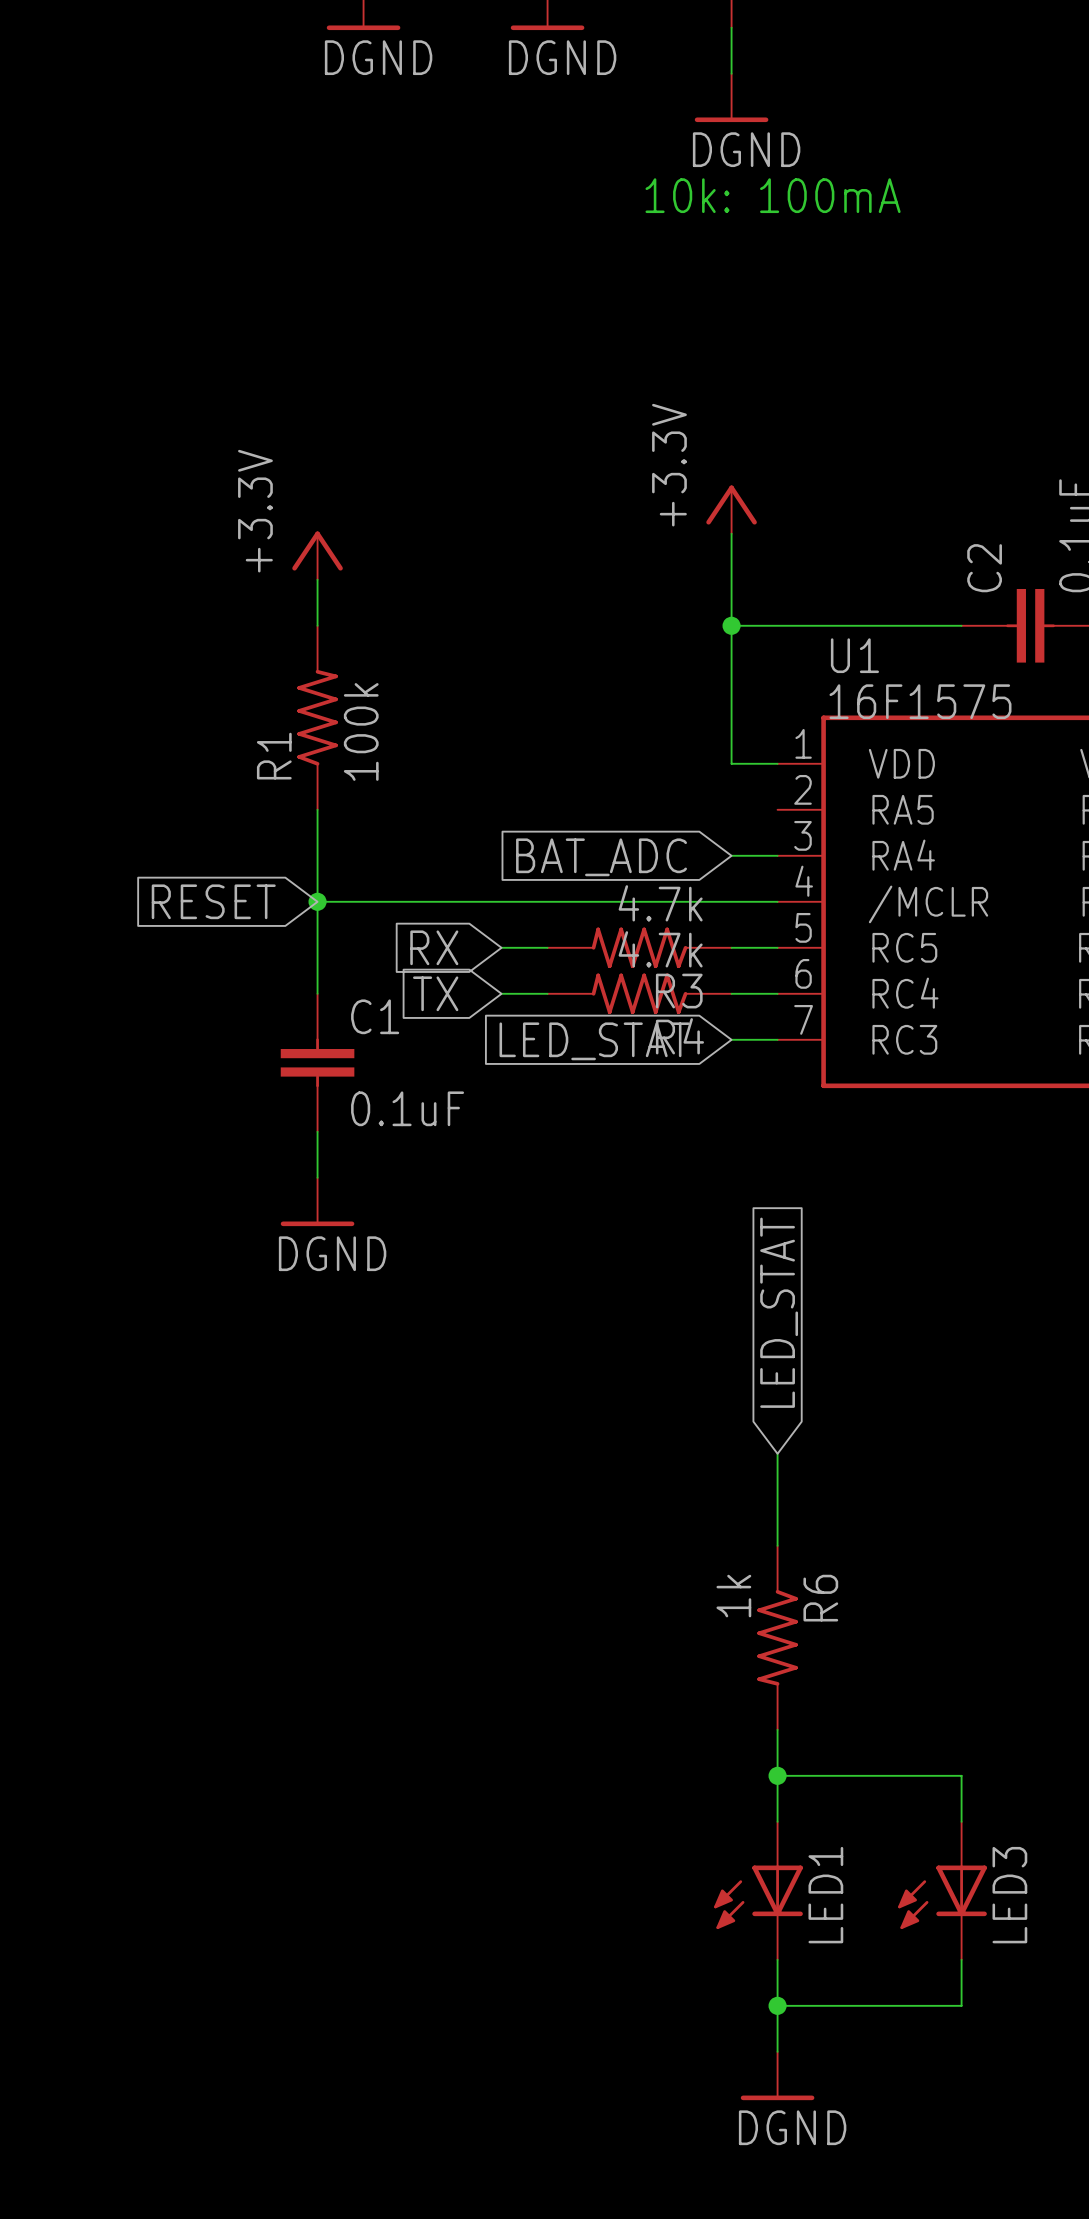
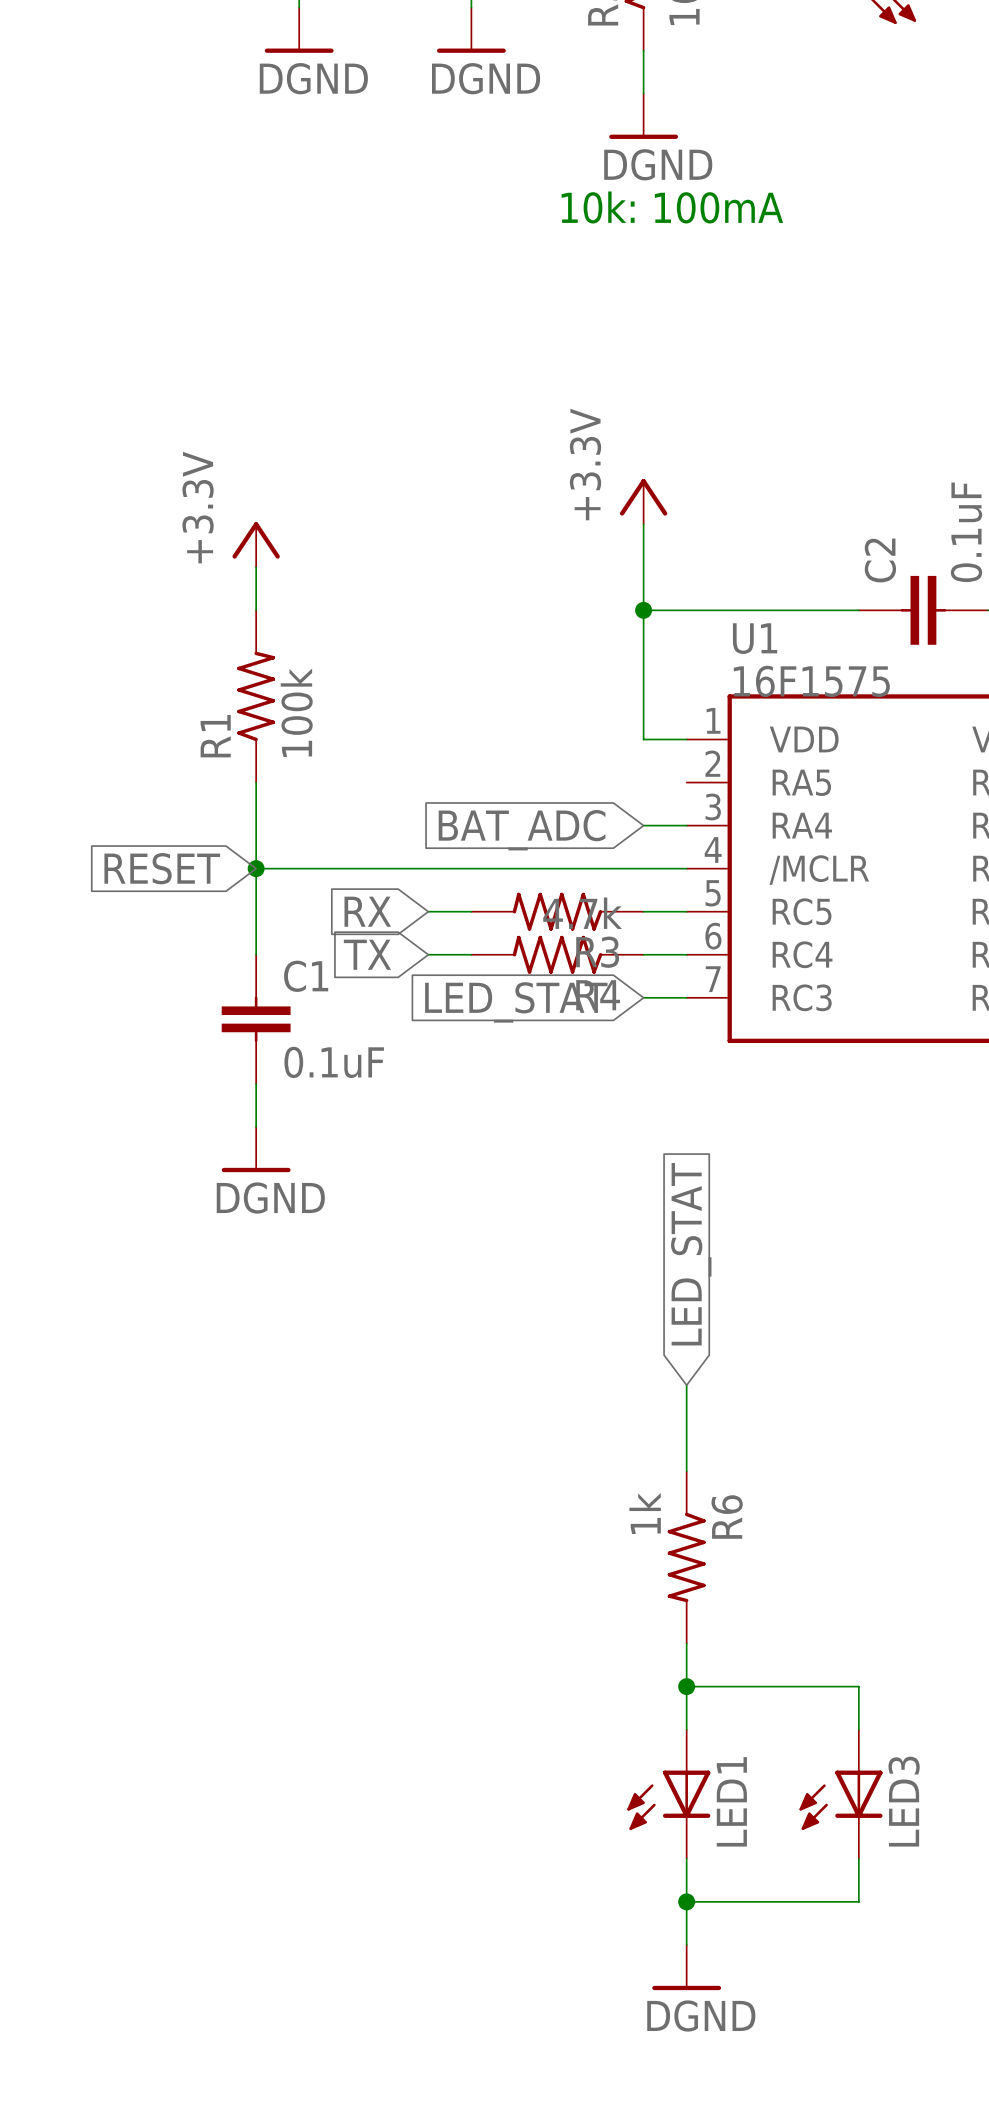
R3 value: 4.7k (660, 903) -> none

